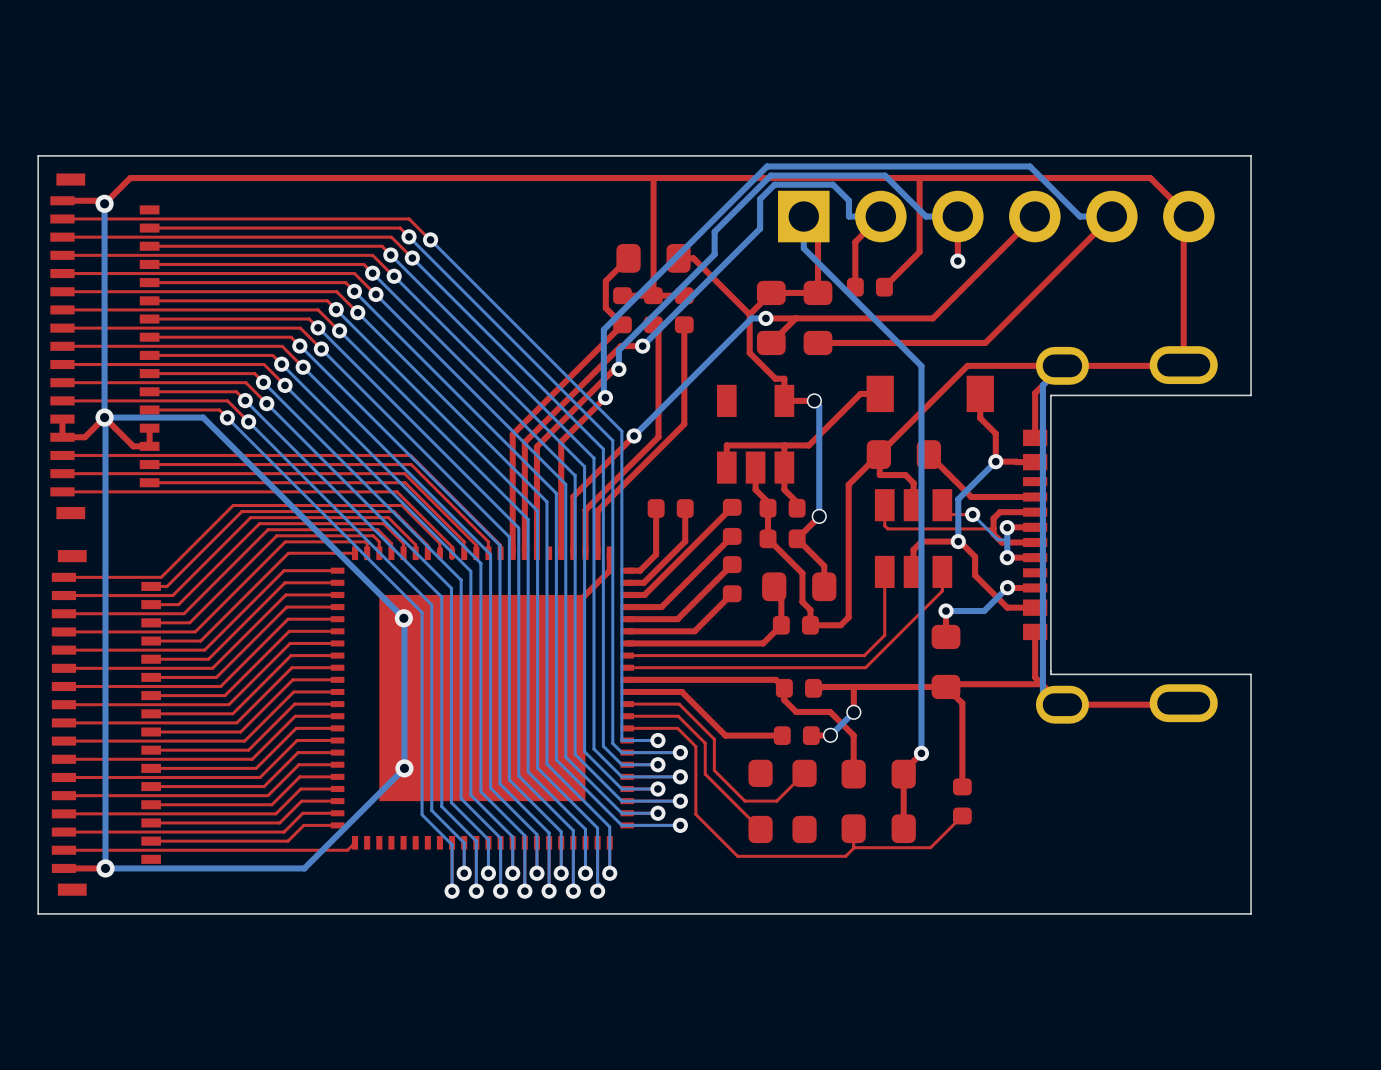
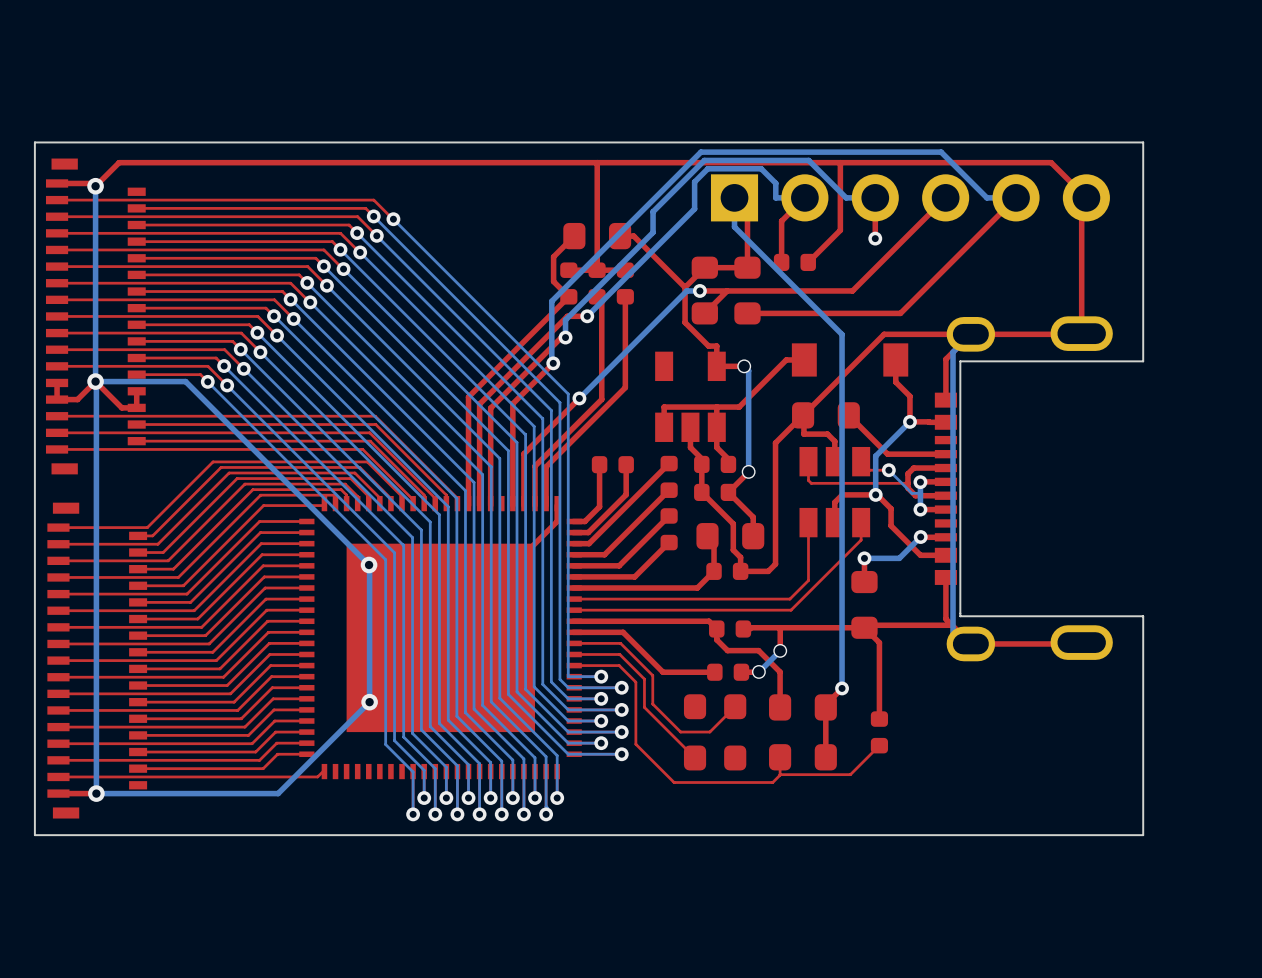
part footprint: [330, 546, 635, 850] -> [299, 496, 582, 780]

